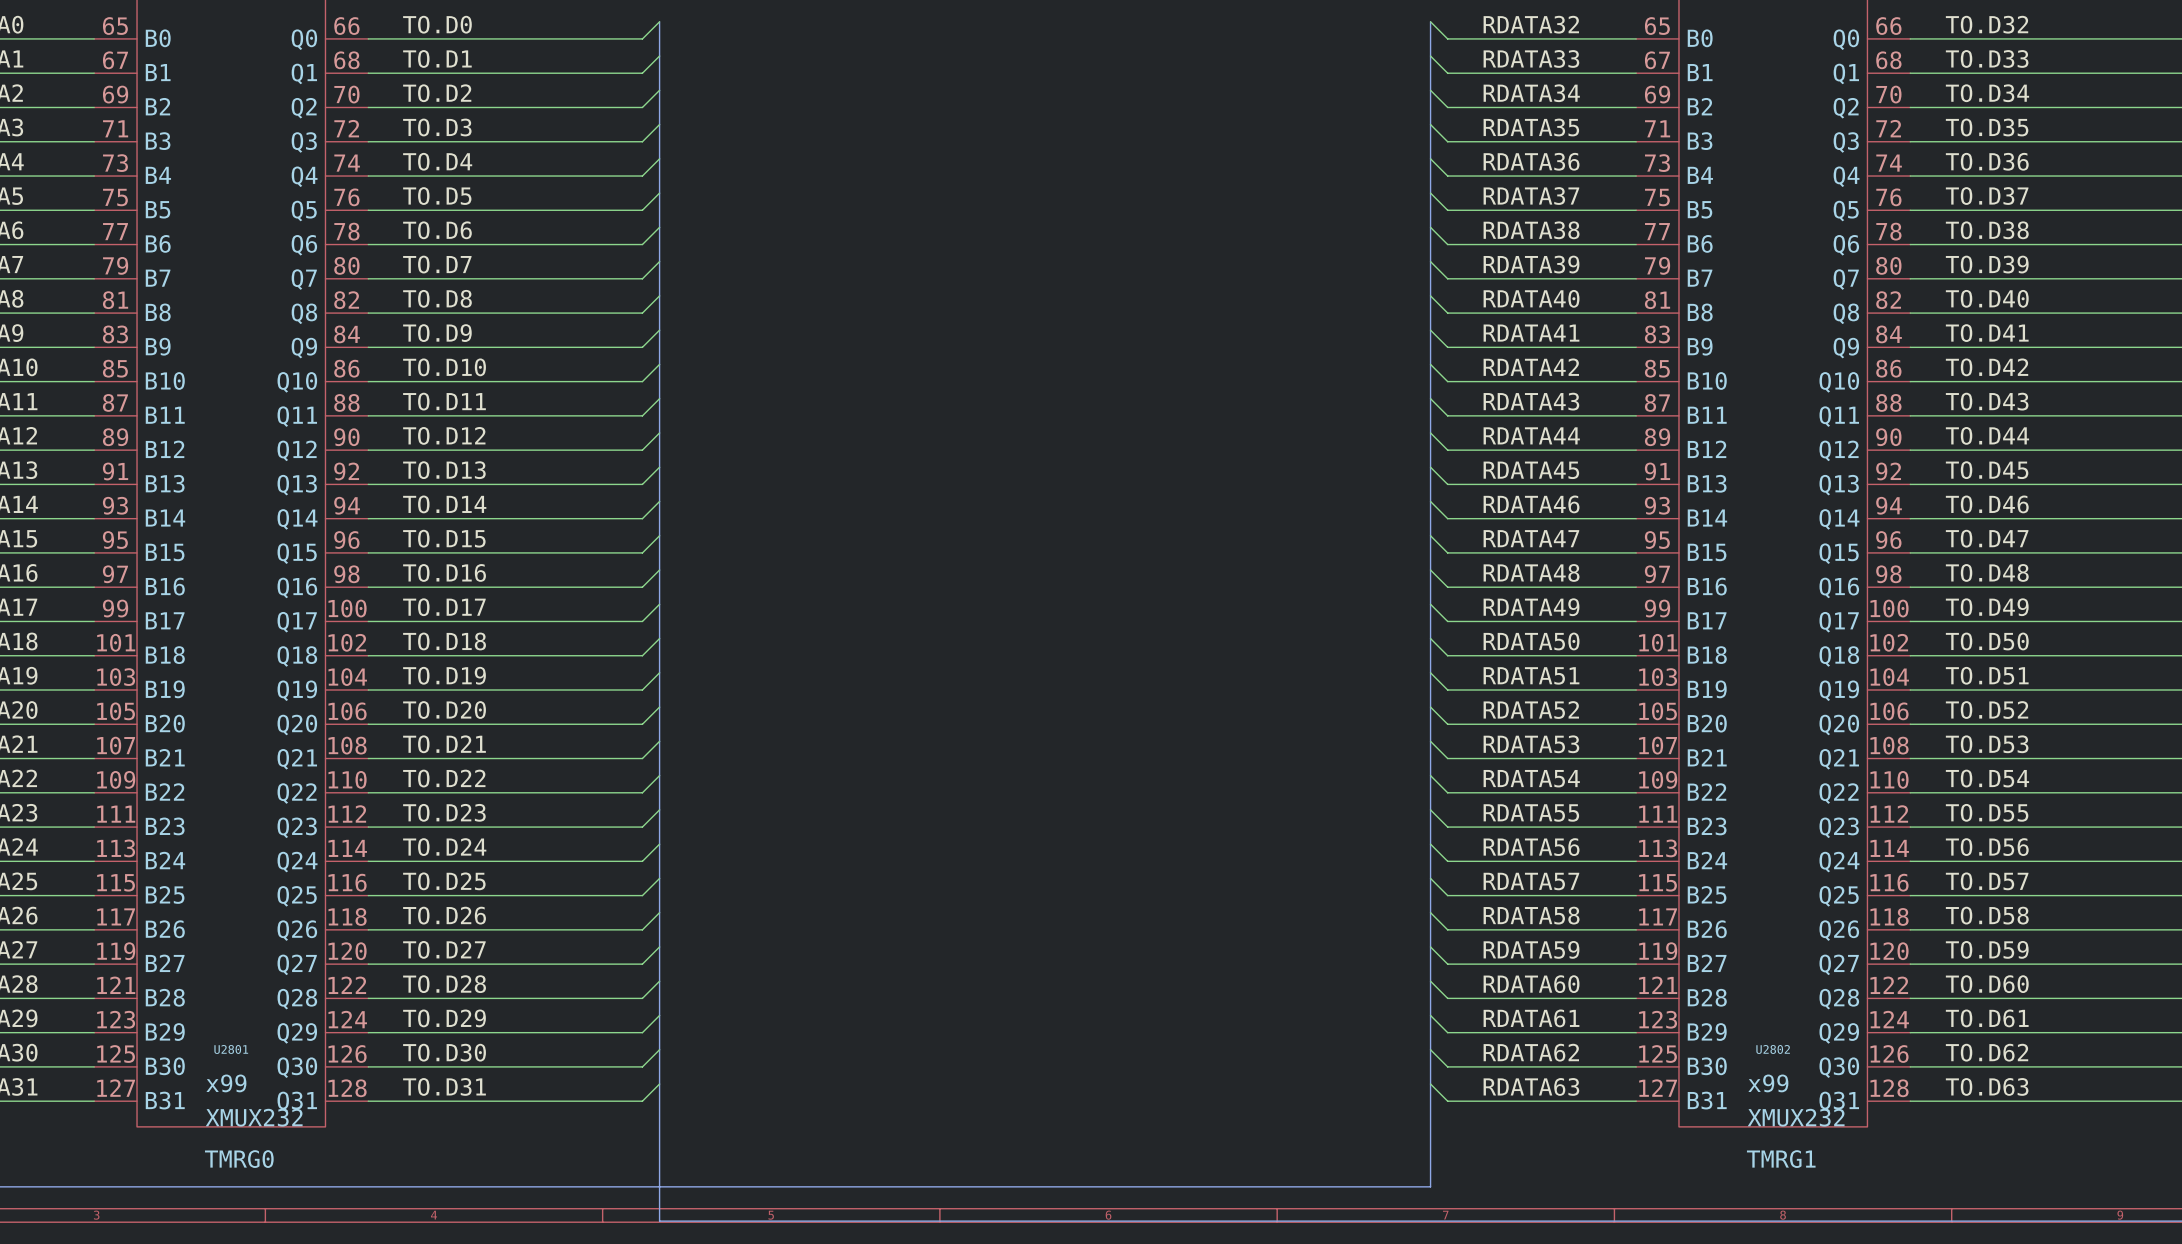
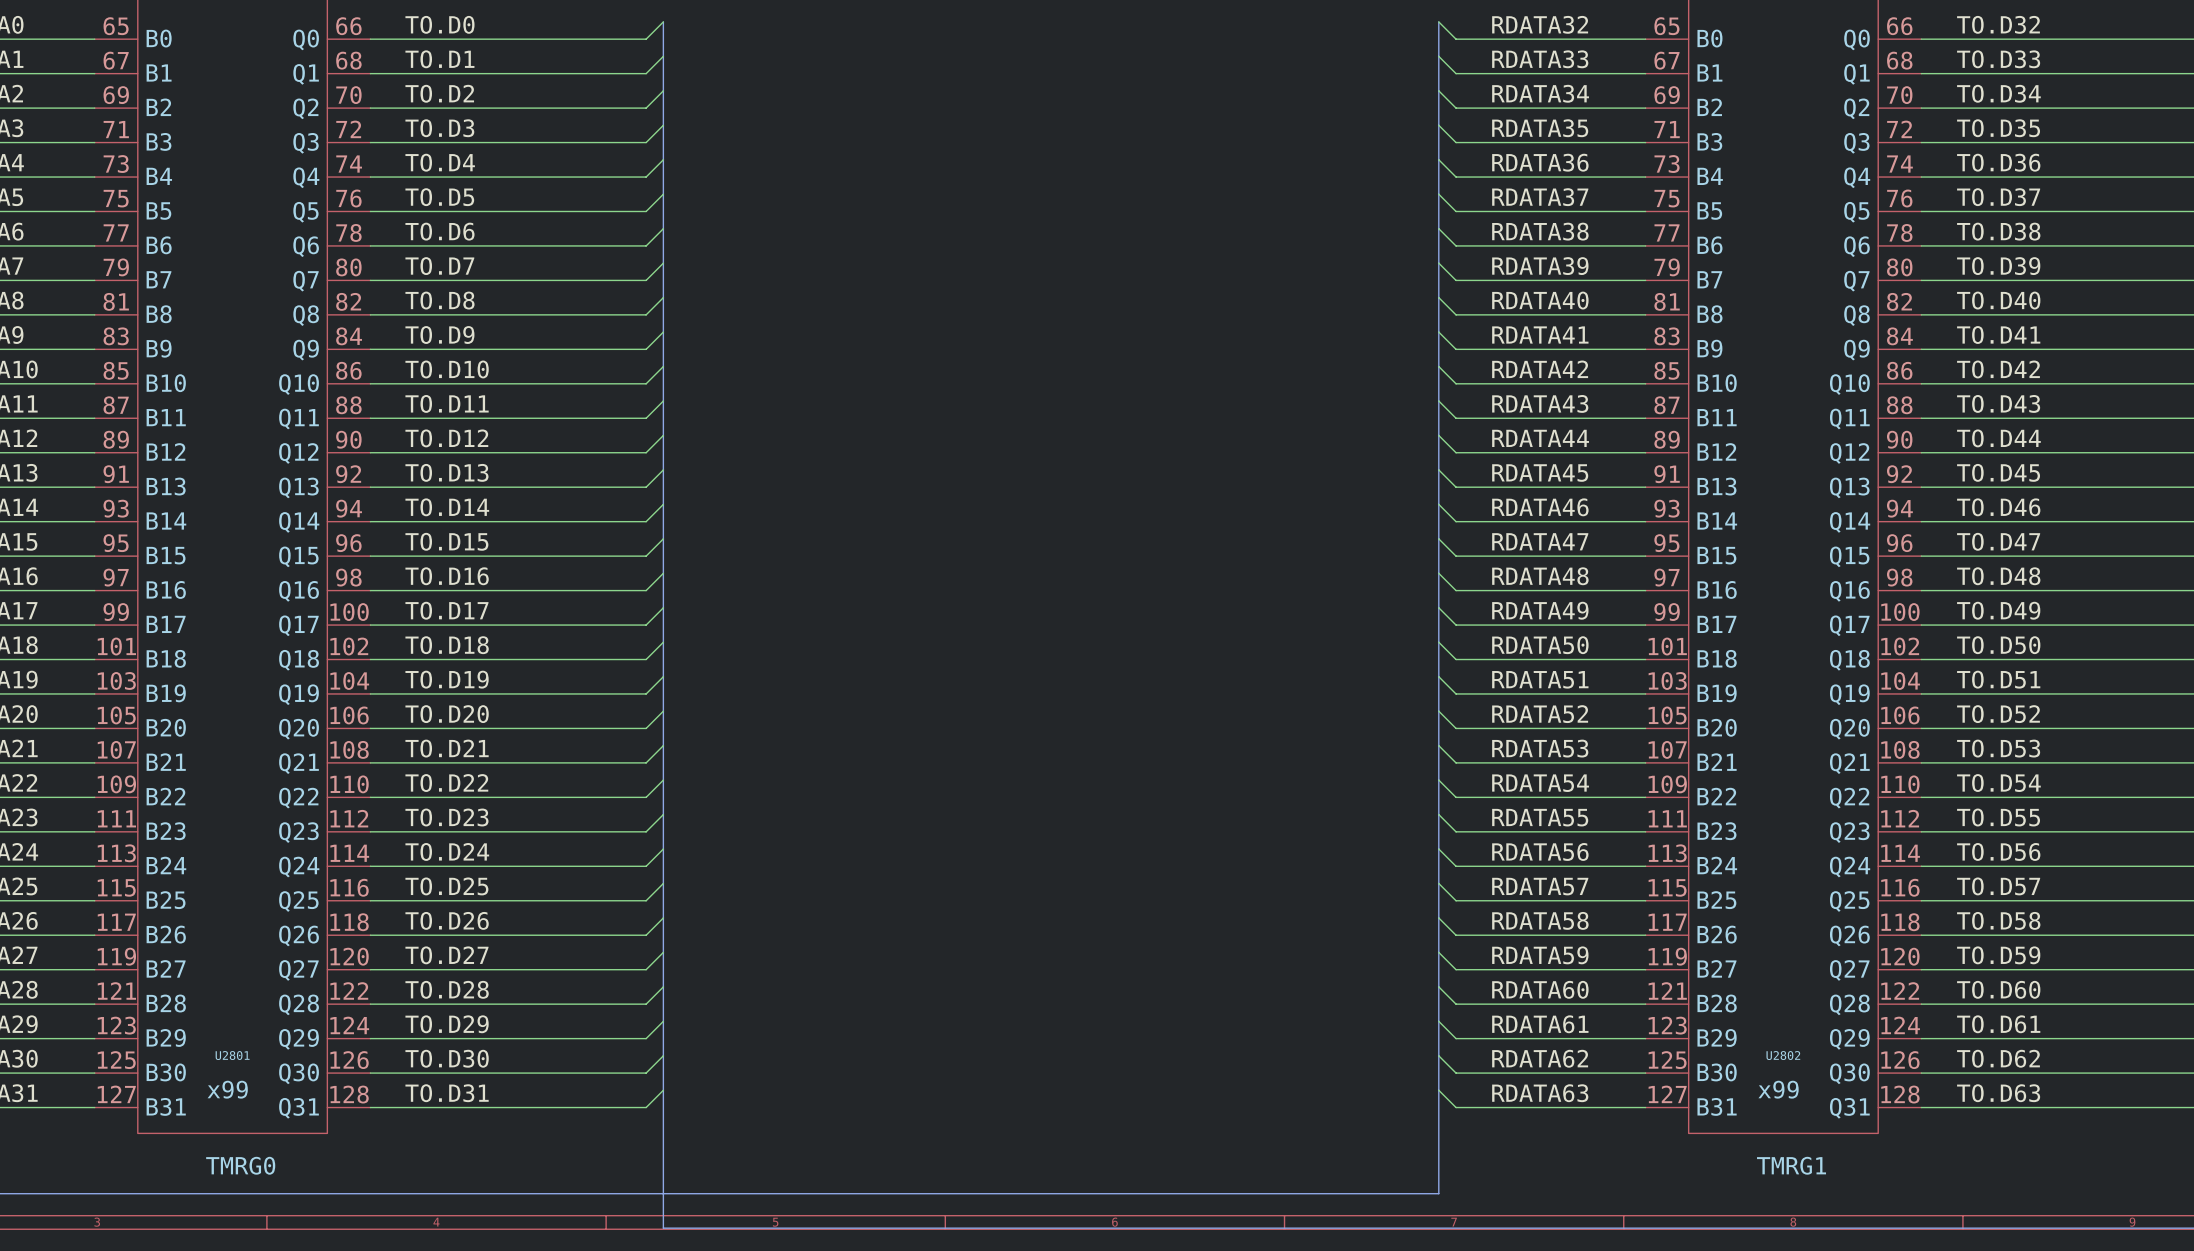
U2801 value: XMUX232 (254, 1117) -> none
U2802 value: XMUX232 (1796, 1117) -> none

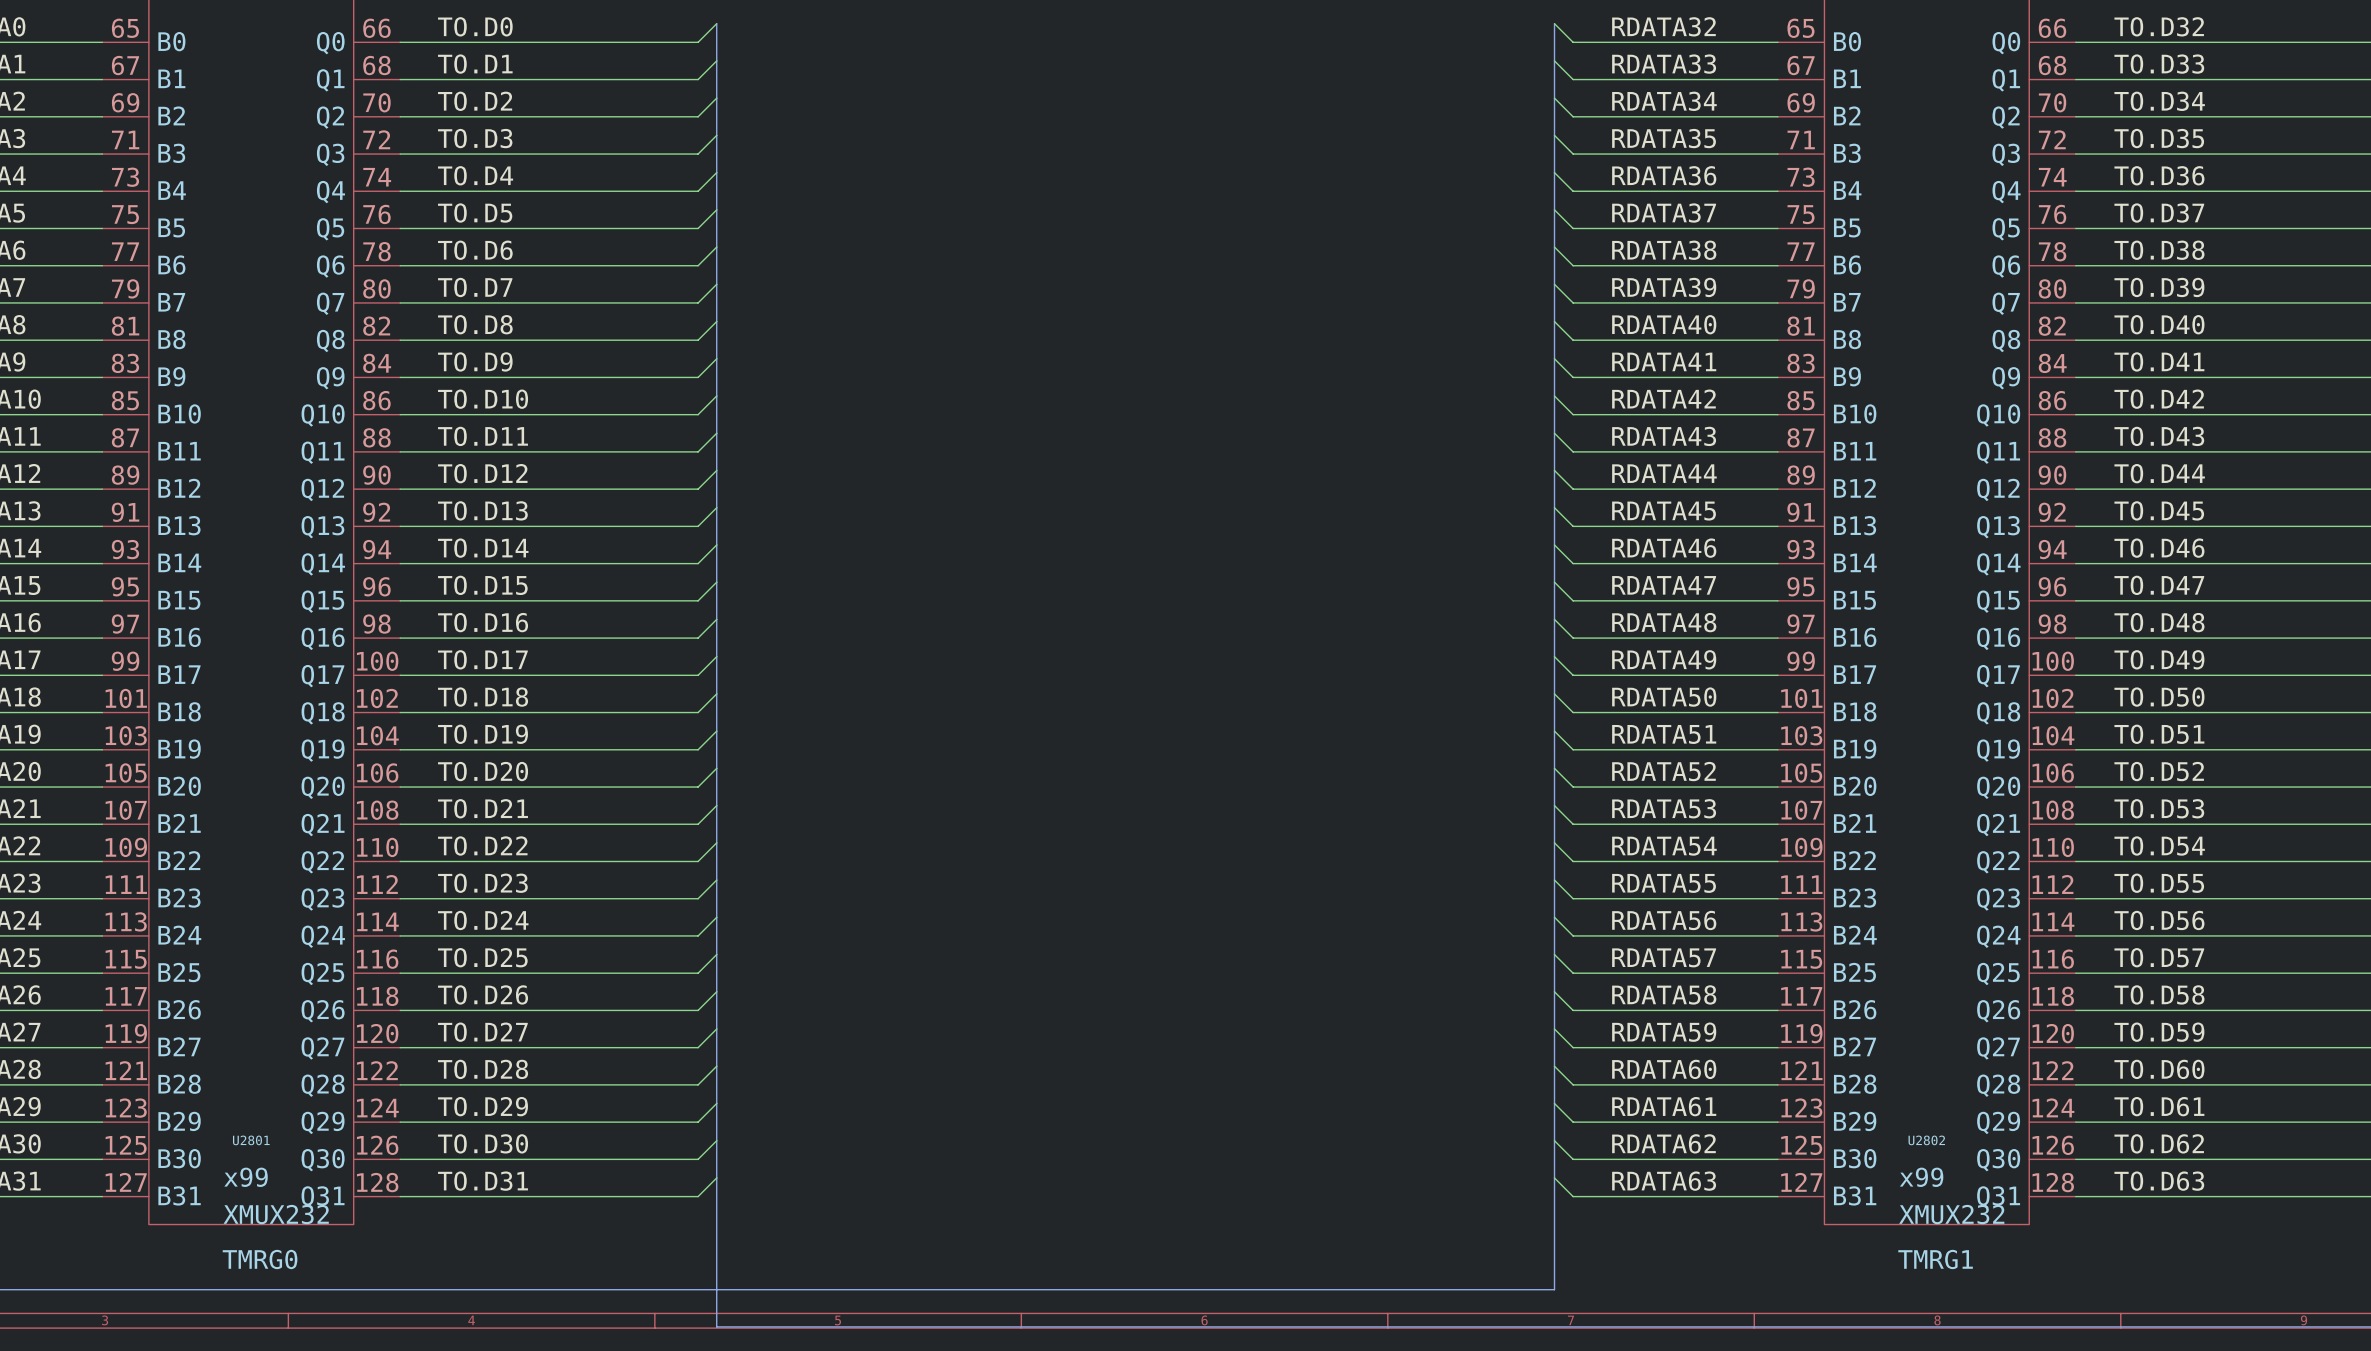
U2801 value: none -> XMUX232 (276, 1214)
U2802 value: none -> XMUX232 (1951, 1214)

